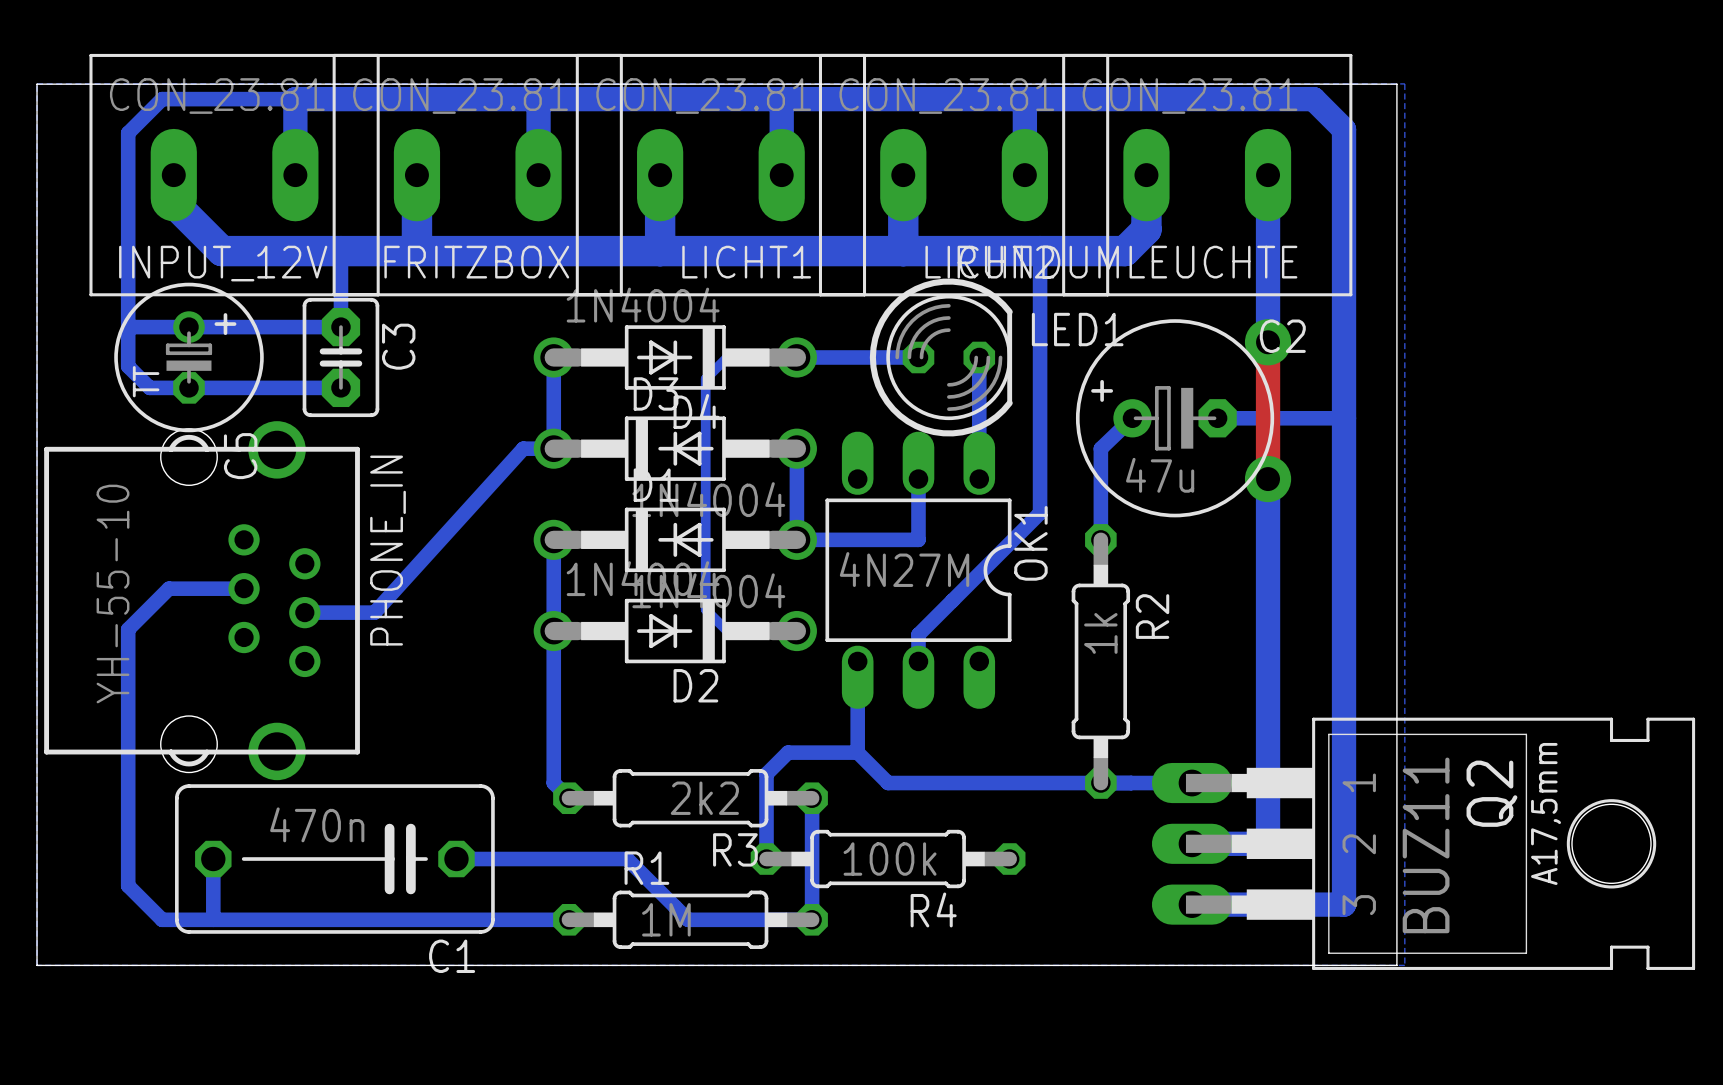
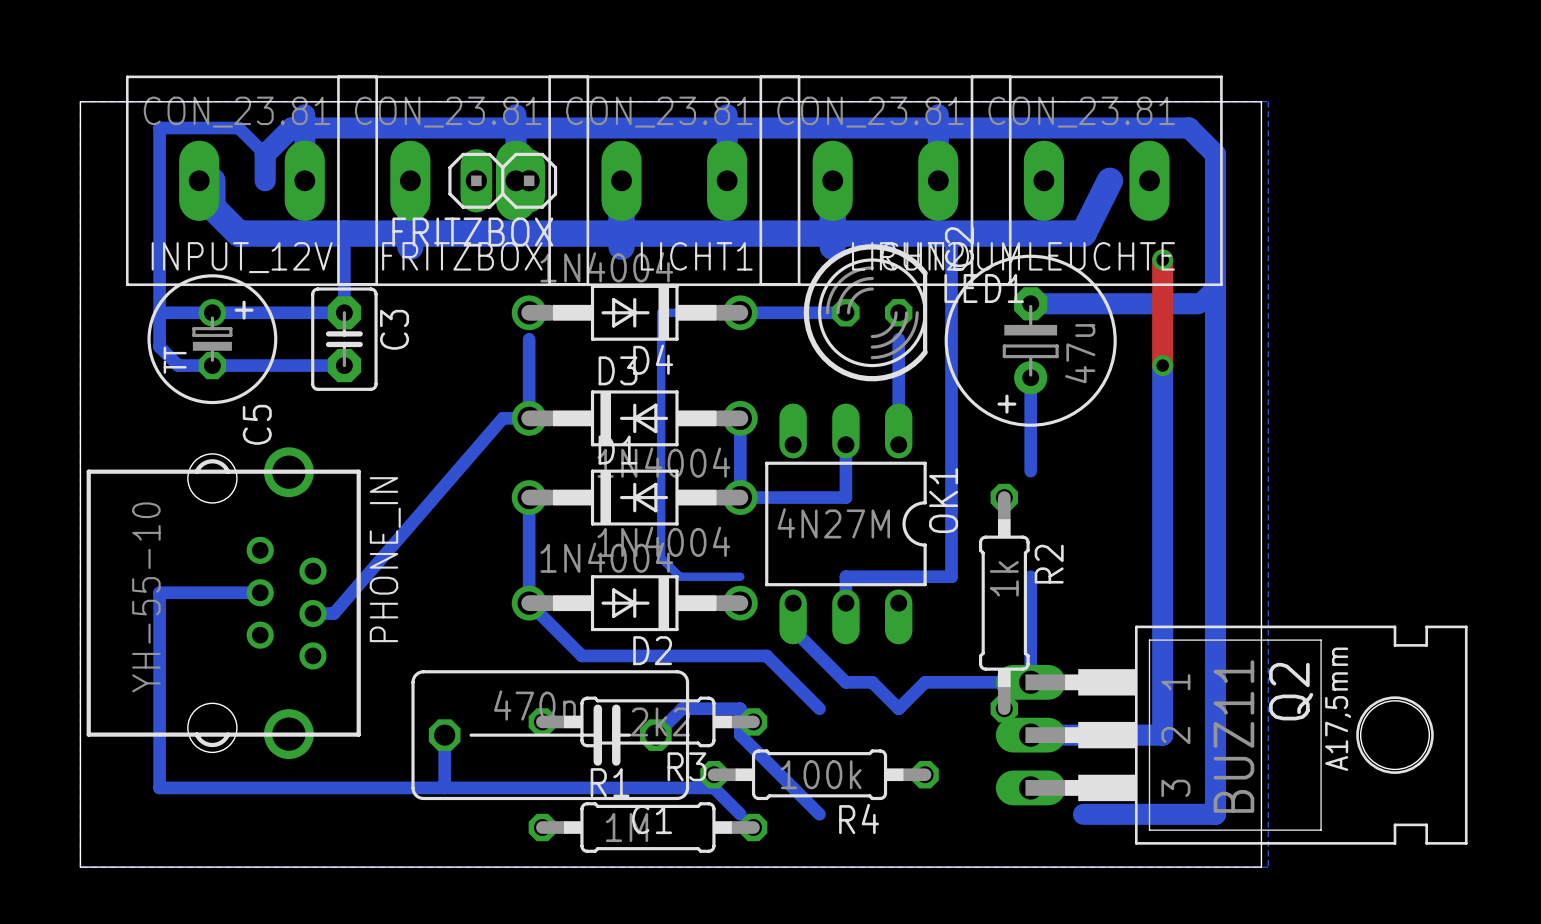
bottom track: (128, 133) (162, 99) (1313, 99) (1344, 129) (1344, 144) -> (265, 154) (291, 128) (1189, 128) (1215, 154)
bottom track: none -> (159, 144) (159, 128) (238, 128) (265, 154)
bottom track: none -> (265, 154) (265, 180)
bottom track: (173, 175) (173, 203) (221, 251) (1124, 251) (1146, 229) (1146, 175) -> none
bottom track: none -> (212, 180) (212, 207) (238, 233) (1083, 233) (1109, 180)
FRITZBOX: none -> (502, 180)
bottom track: (1268, 175) (1268, 342) -> none
top track: none -> (1162, 259) (1162, 365)
via: none -> (1162, 259)
bottom track: none -> (1215, 286) (1198, 303) (1030, 303)
top track: (1268, 342) (1268, 479) -> none
via: (1268, 342) -> none
D4 position: (675, 357) -> (634, 312)
bottom track: (918, 357) (727, 357) (705, 378) -> (845, 312) (661, 312) (661, 357)
LED1 position: (941, 357) -> (865, 312)
bottom track: none -> (1162, 365) (1162, 735) (1030, 735)
via: none -> (1162, 365)
bottom track: none -> (1030, 377) (1030, 471)
bottom track: (1132, 418) (1100, 448) (1100, 539) -> none
C2 rotation: 0° (1175, 418) -> 90° counterclockwise (1030, 340)
bottom track: (1217, 418) (1344, 418) -> none
bottom track: (523, 448) (374, 612) (304, 612) -> (502, 418) (333, 613) (313, 613)
bottom track: (1268, 479) (1268, 843) (1192, 843) -> none
via: (1268, 479) -> none
bottom track: (1040, 513) (918, 634) -> (951, 474) (951, 576) (845, 576) (845, 579)
bottom track: (244, 588) (168, 588) (128, 629) (128, 649) -> (260, 592) (159, 592)
PHONE_IN position: (202, 600) -> (223, 603)
D2 position: (675, 631) -> (634, 603)
bottom track: (553, 661) (553, 783) (568, 798) -> (529, 603) (581, 655) (766, 655) (793, 682)
bottom track: (857, 691) (857, 752) (788, 752) (766, 774) (766, 859) -> (793, 629) (845, 682) (872, 682) (898, 708) (925, 682) (1030, 682) (1030, 576)
bottom track: (888, 783) (1192, 783) -> none
bottom track: (812, 798) (812, 919) (688, 919) (627, 859) (456, 859) -> none
bottom track: none -> (655, 735) (682, 708) (740, 708) (740, 735) (819, 814)
Q2 position: (1423, 843) -> (1231, 735)
bottom track: (213, 859) (213, 919) -> (444, 735) (444, 787)
C1 position: (334, 859) -> (550, 735)
bottom track: (128, 874) (128, 885) (162, 919) (568, 919) -> (159, 787) (713, 787) (740, 814)

